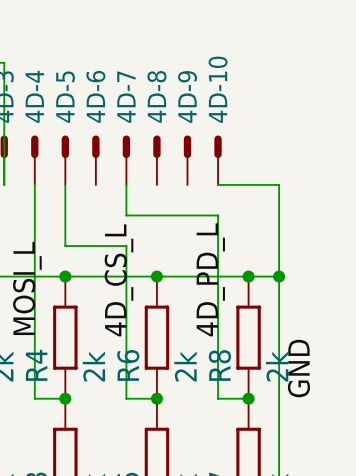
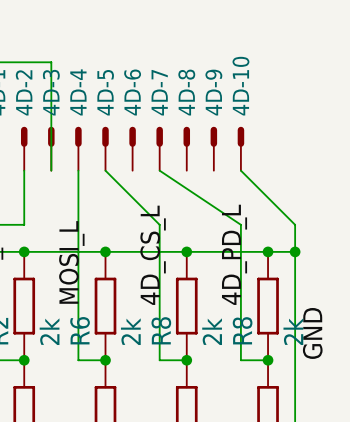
wire: (65, 184) (65, 246) (126, 246) -> (105, 170) (159, 224)
wire: (126, 184) (126, 215) (218, 215) (218, 246) -> (159, 170) (240, 224)
wire: (218, 184) (279, 184) (279, 246) -> (240, 170) (295, 224)
R4 name: R4 (36, 365) -> R6 (80, 330)
R6 name: R6 (128, 365) -> R8 (161, 330)

